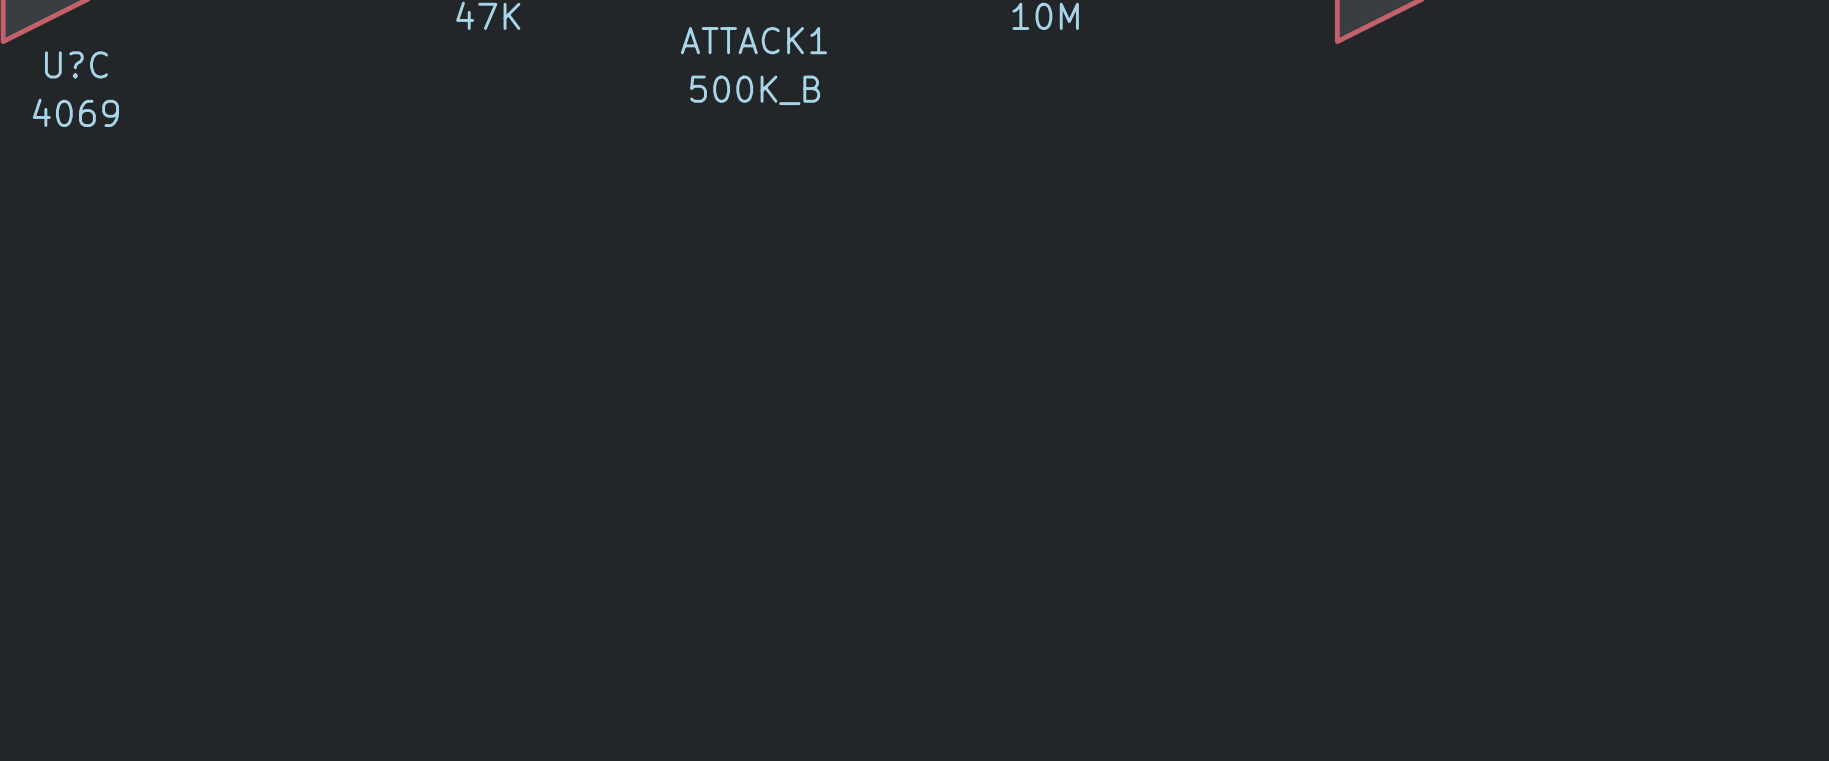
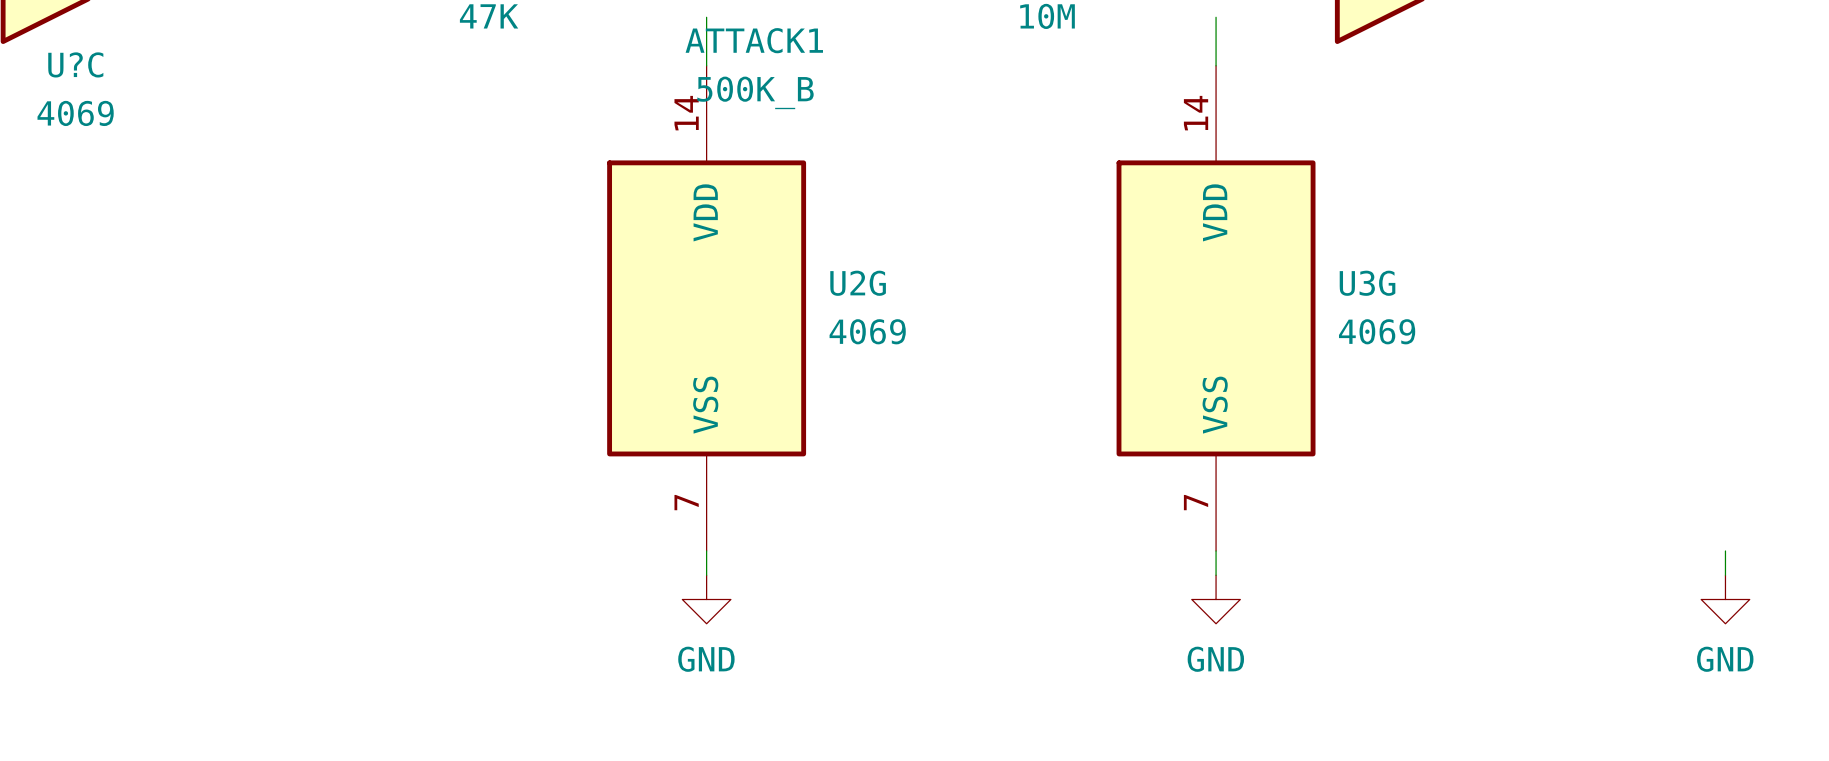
wire: none -> (706, 17) (706, 65)
wire: none -> (1216, 17) (1216, 65)
U2G: none -> 4069 (706, 308)
U3G: none -> 4069 (1216, 308)
wire: none -> (706, 550) (706, 575)
wire: none -> (1216, 550) (1216, 575)
wire: none -> (1725, 550) (1725, 575)
power symbol: none -> GND (706, 599)
power symbol: none -> GND (1216, 599)
power symbol: none -> GND (1725, 599)

